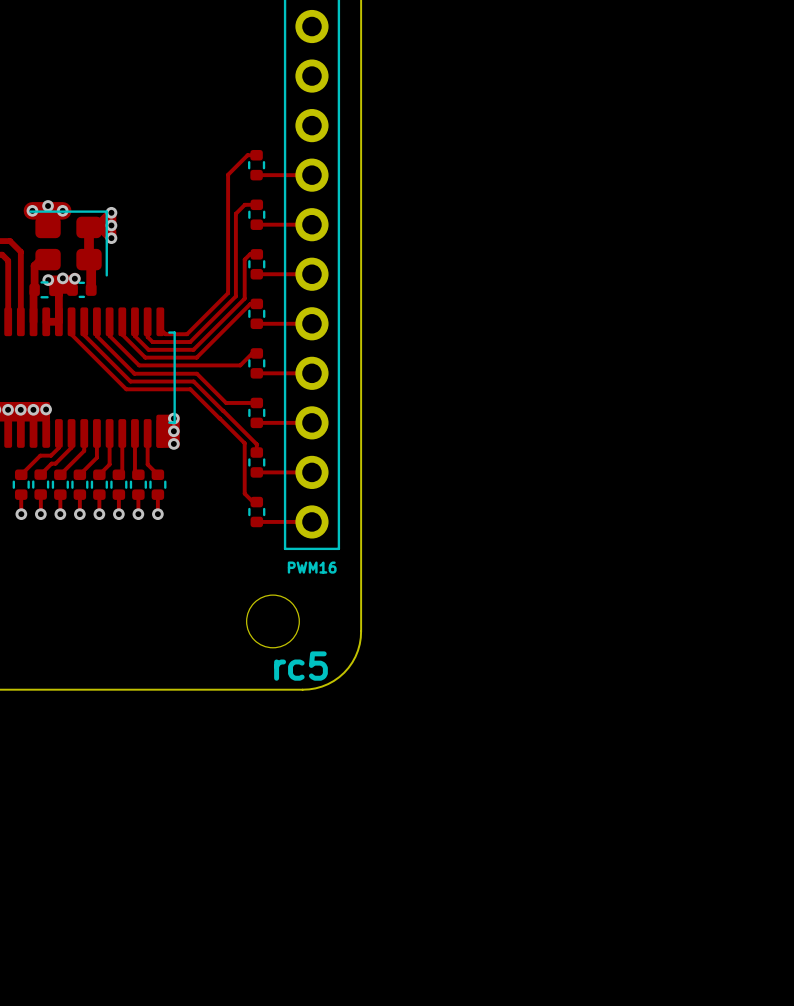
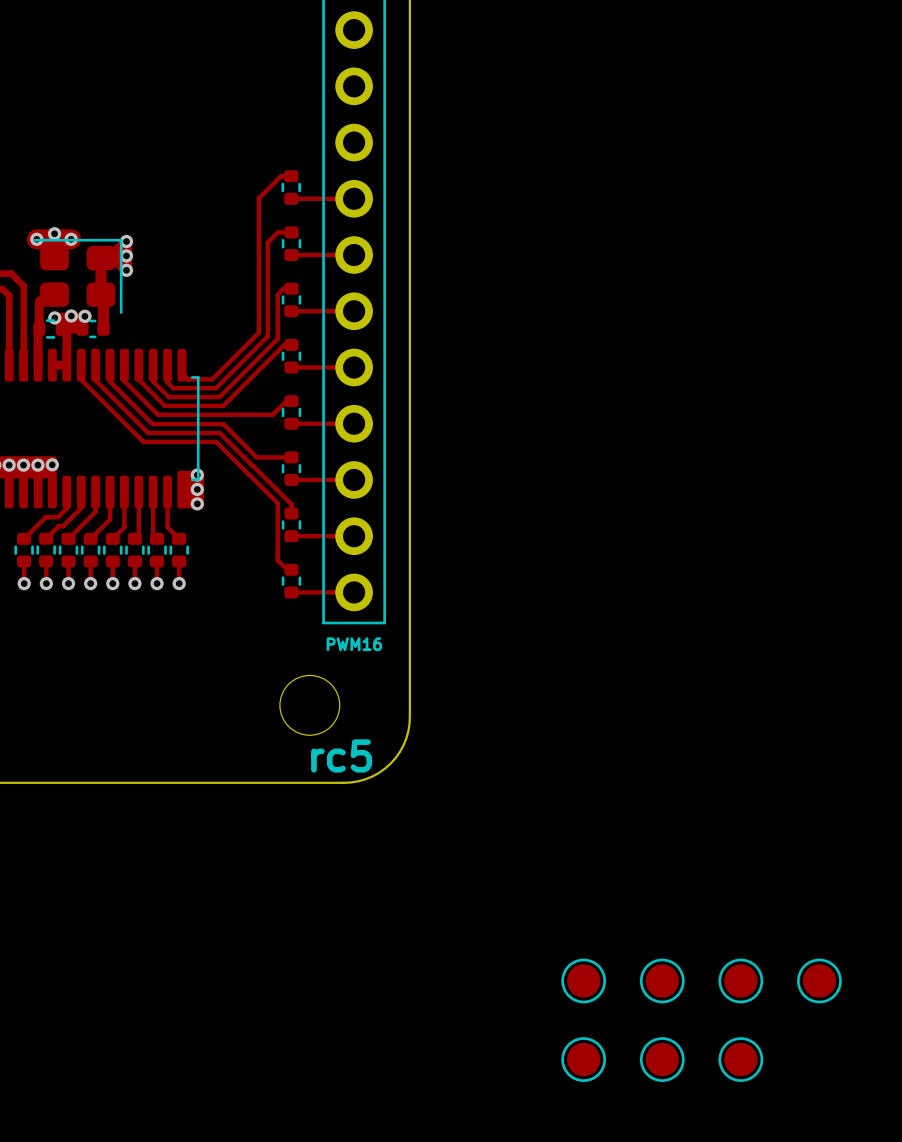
part: none -> (583, 980)
part: none -> (662, 980)
part: none -> (740, 980)
part: none -> (819, 980)
part: none -> (583, 1059)
part: none -> (662, 1059)
part: none -> (740, 1059)

